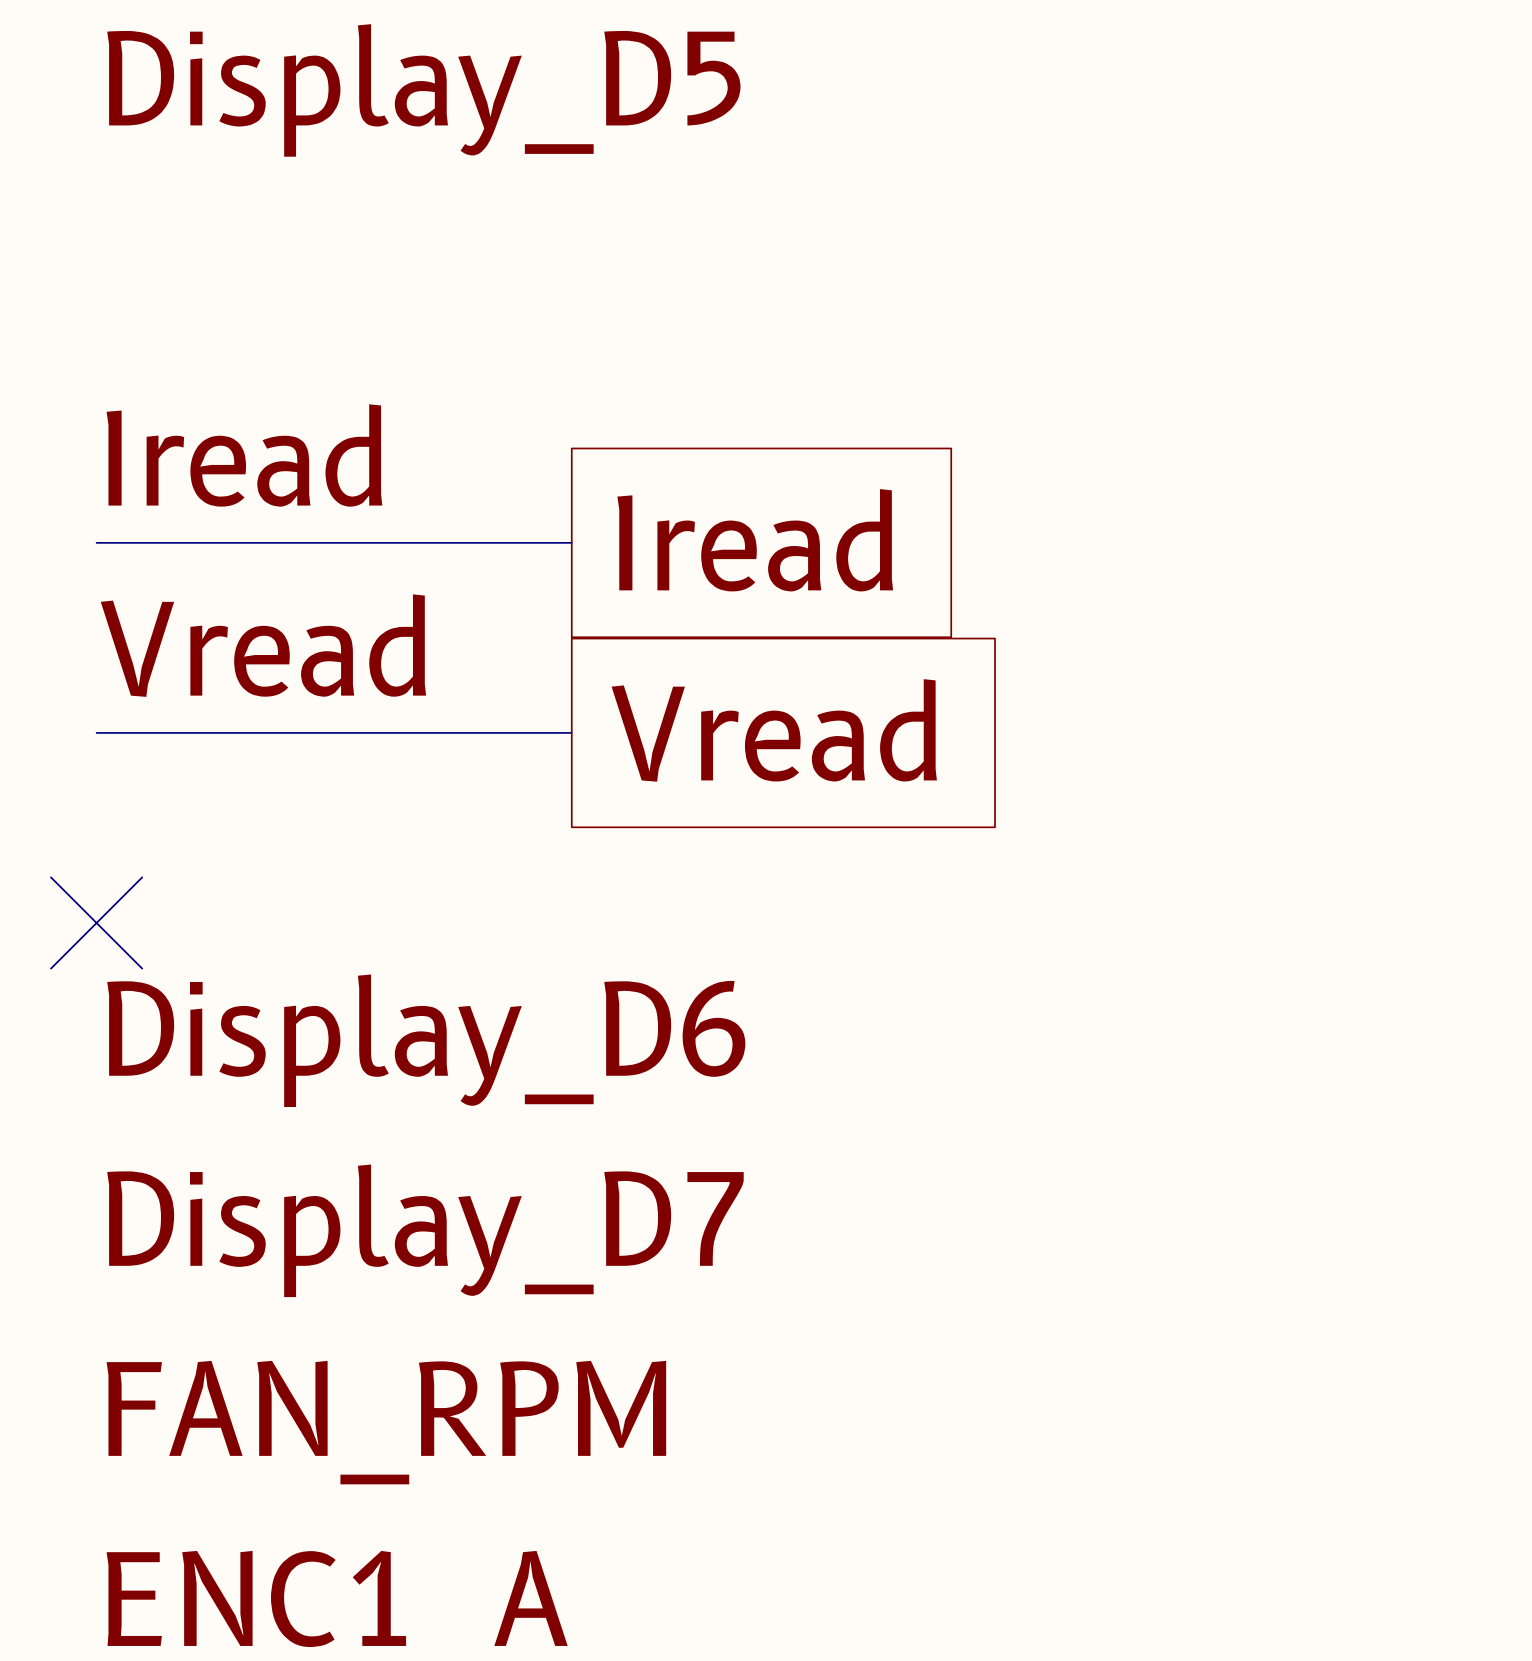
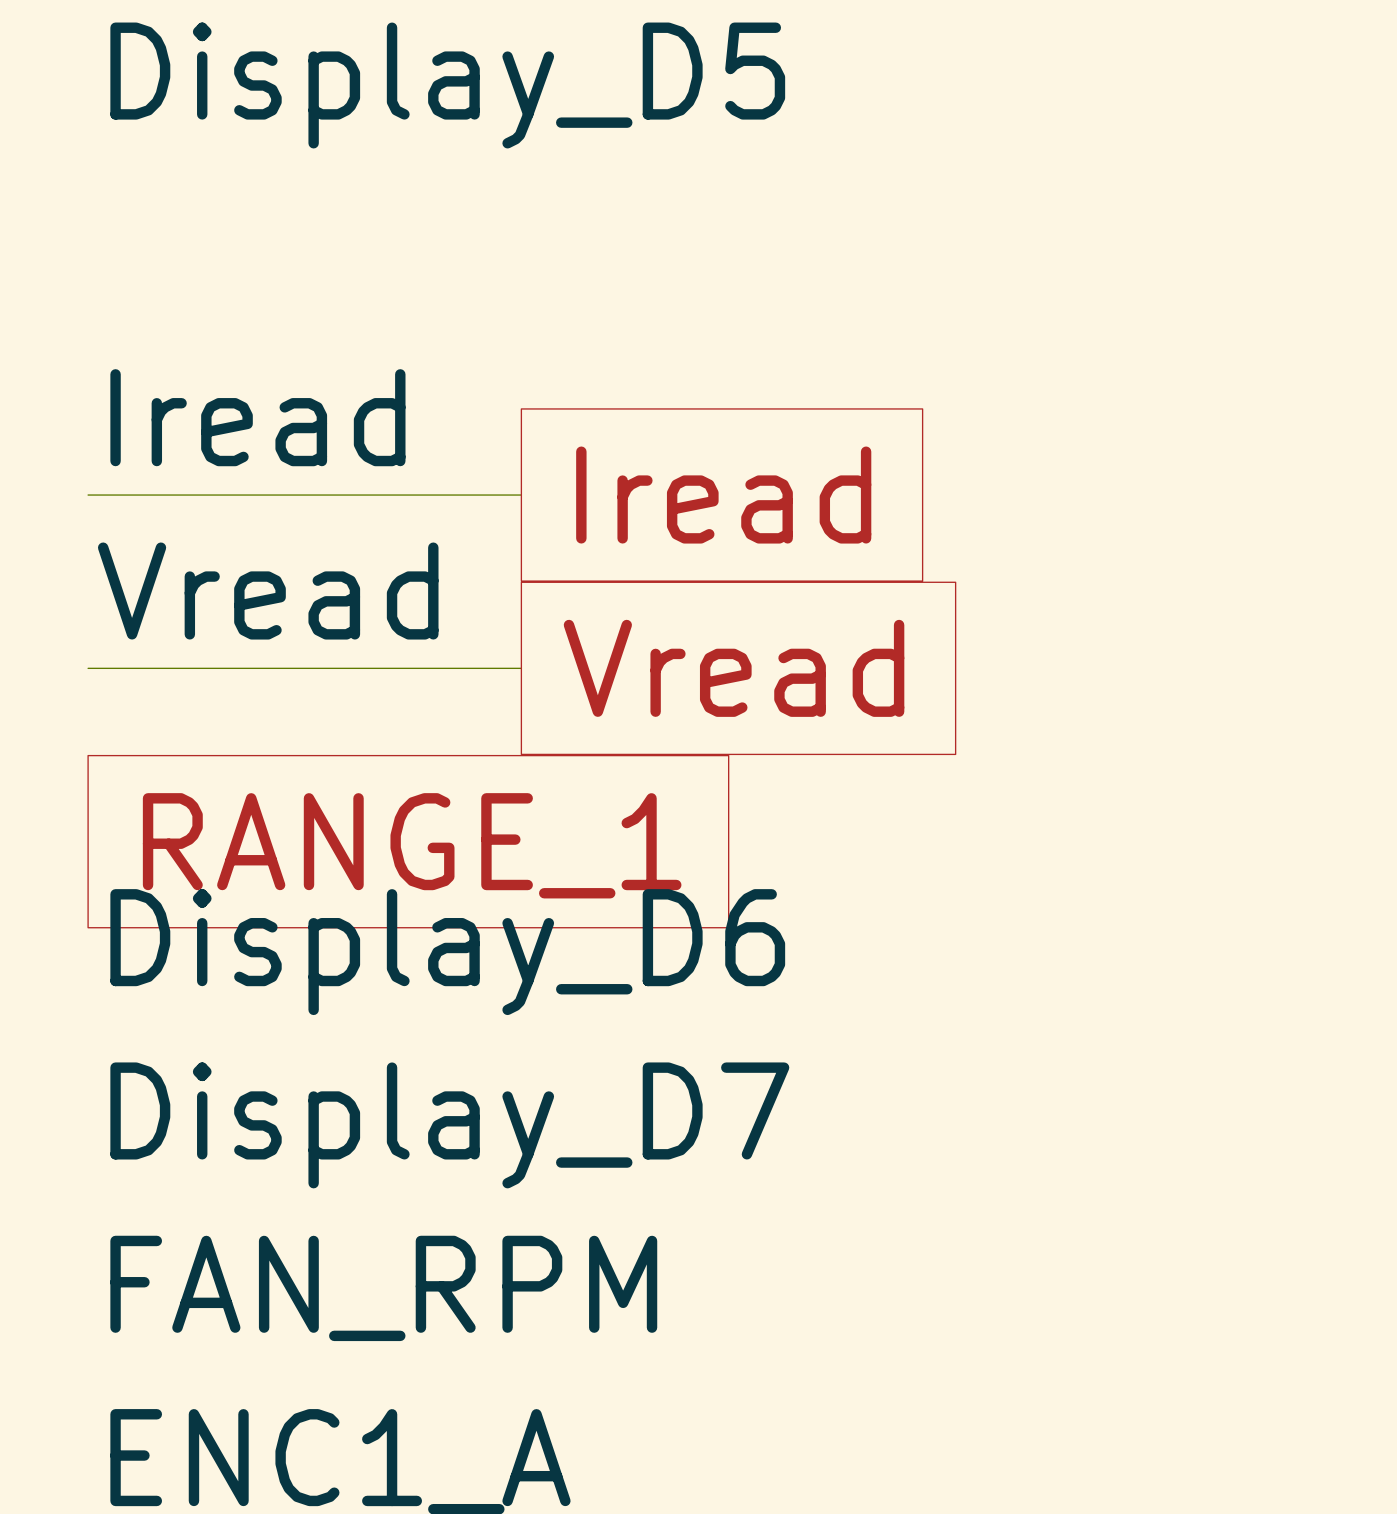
no-connect mark: (96, 922) -> none
global label: none -> RANGE_1 (412, 845)

